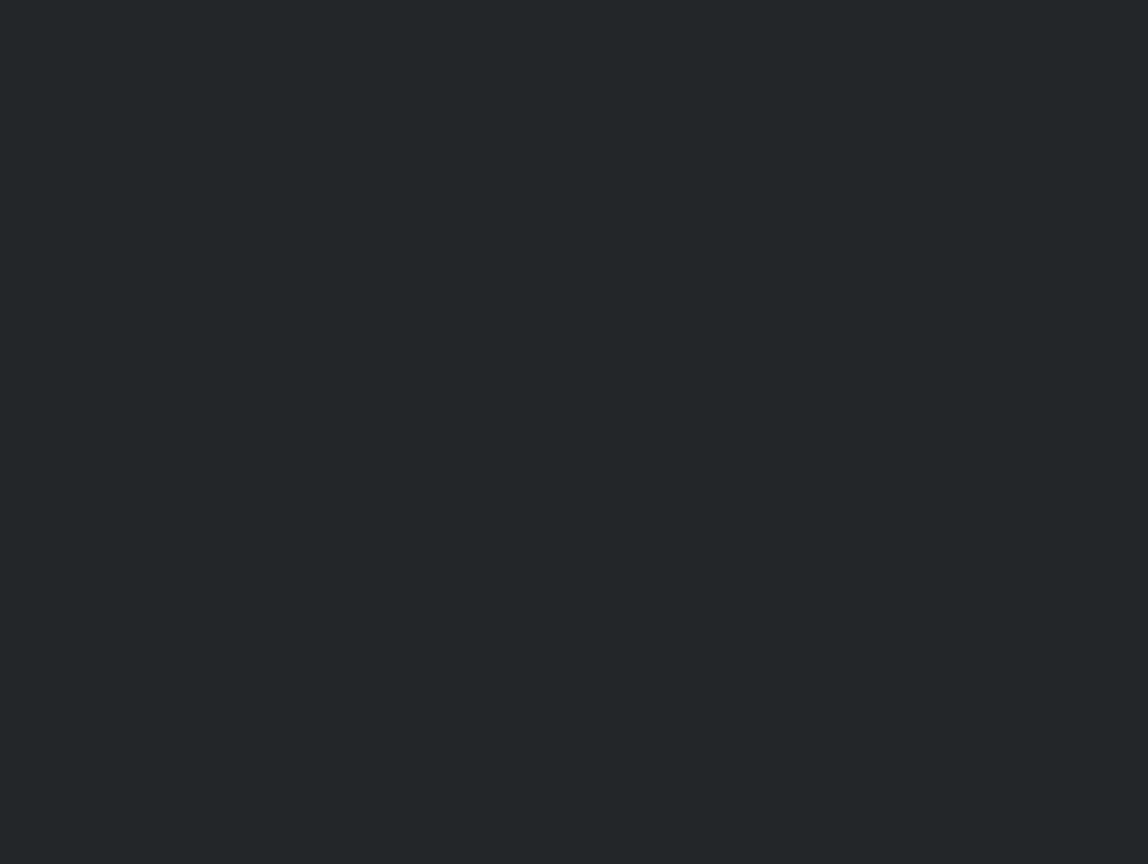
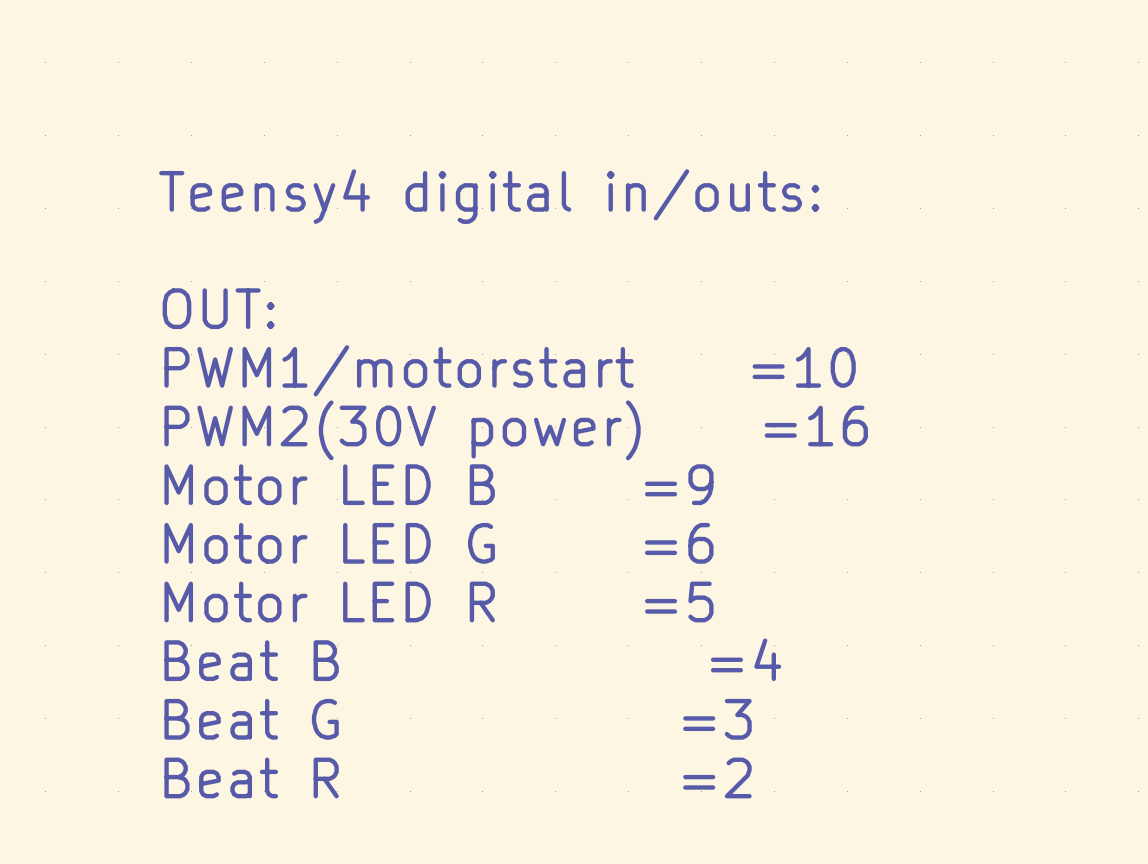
text: none -> Teensy4 digital in/outs: (489, 196)
text: none -> OUT: (218, 308)
text: none -> PWM1/motorstart =10 (510, 370)
text: none -> PWM2(30V power) =16 (516, 430)
text: none -> Motor LED B =9 (438, 484)
text: none -> Motor LED G =6 (438, 543)
text: none -> Motor LED R =5 (438, 601)
text: none -> Beat B =4 (472, 659)
text: none -> Beat G =3 (458, 719)
text: none -> Beat R =2 (458, 777)

